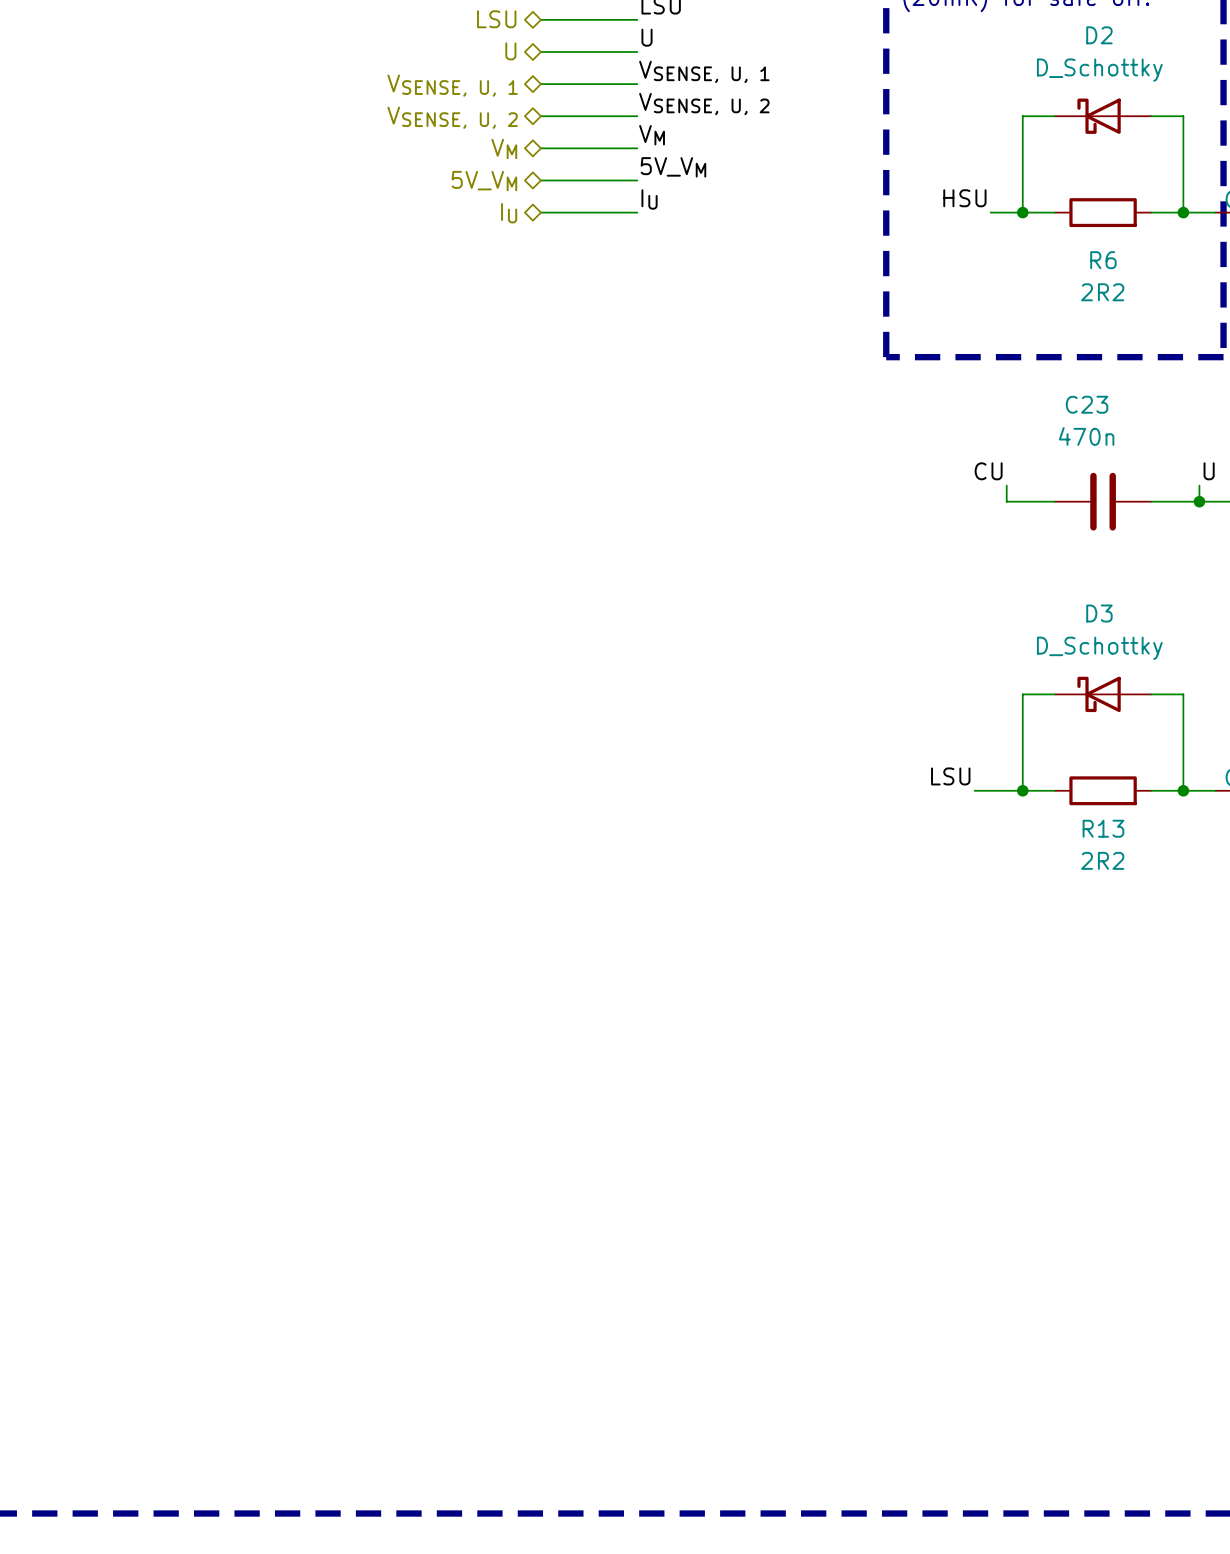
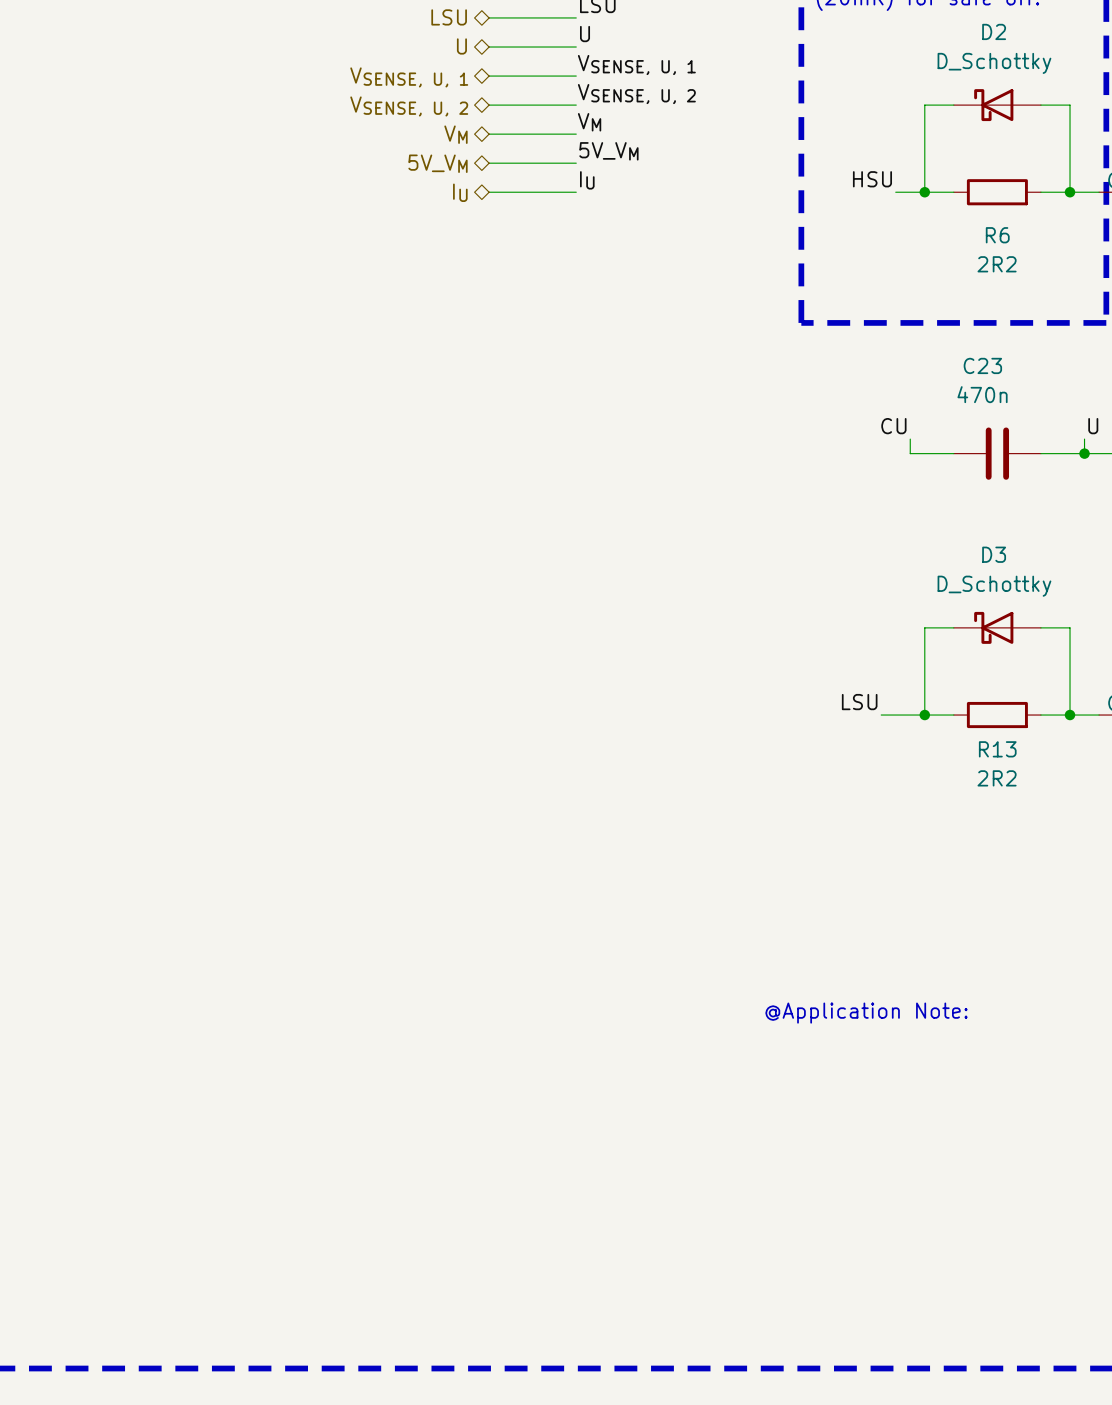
text: none -> @Application Note: (866, 1013)

